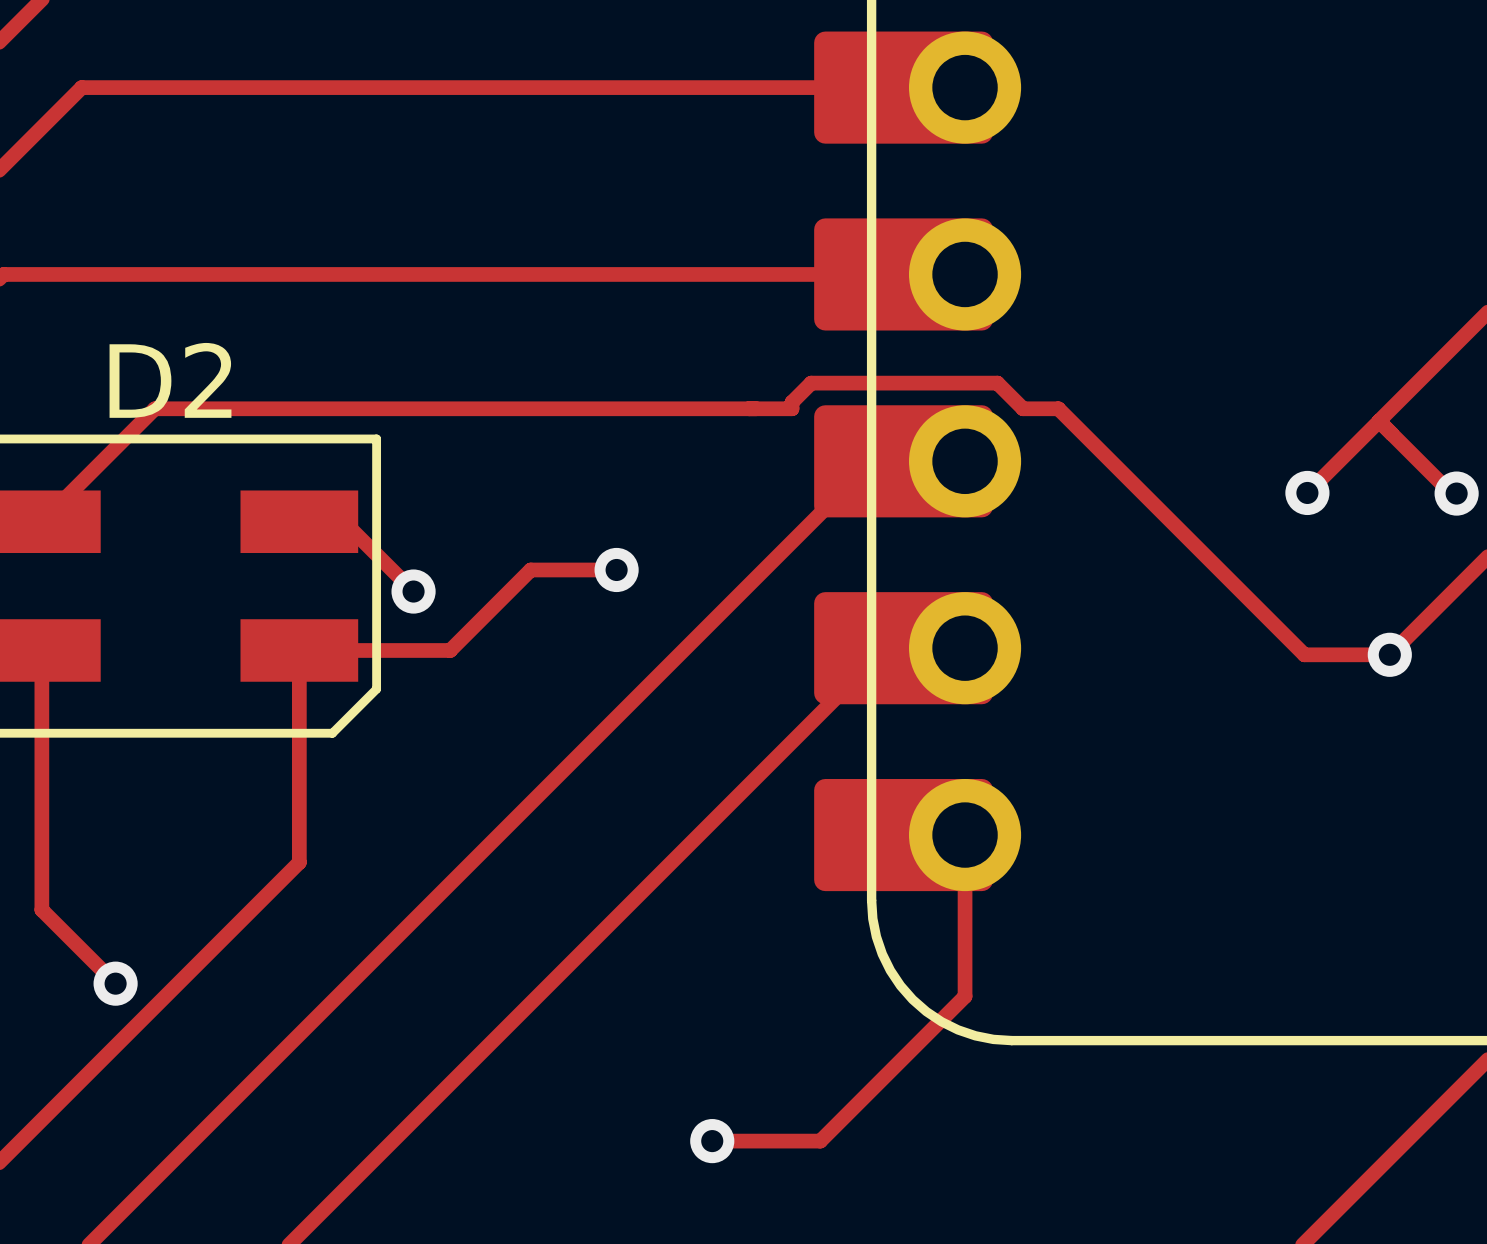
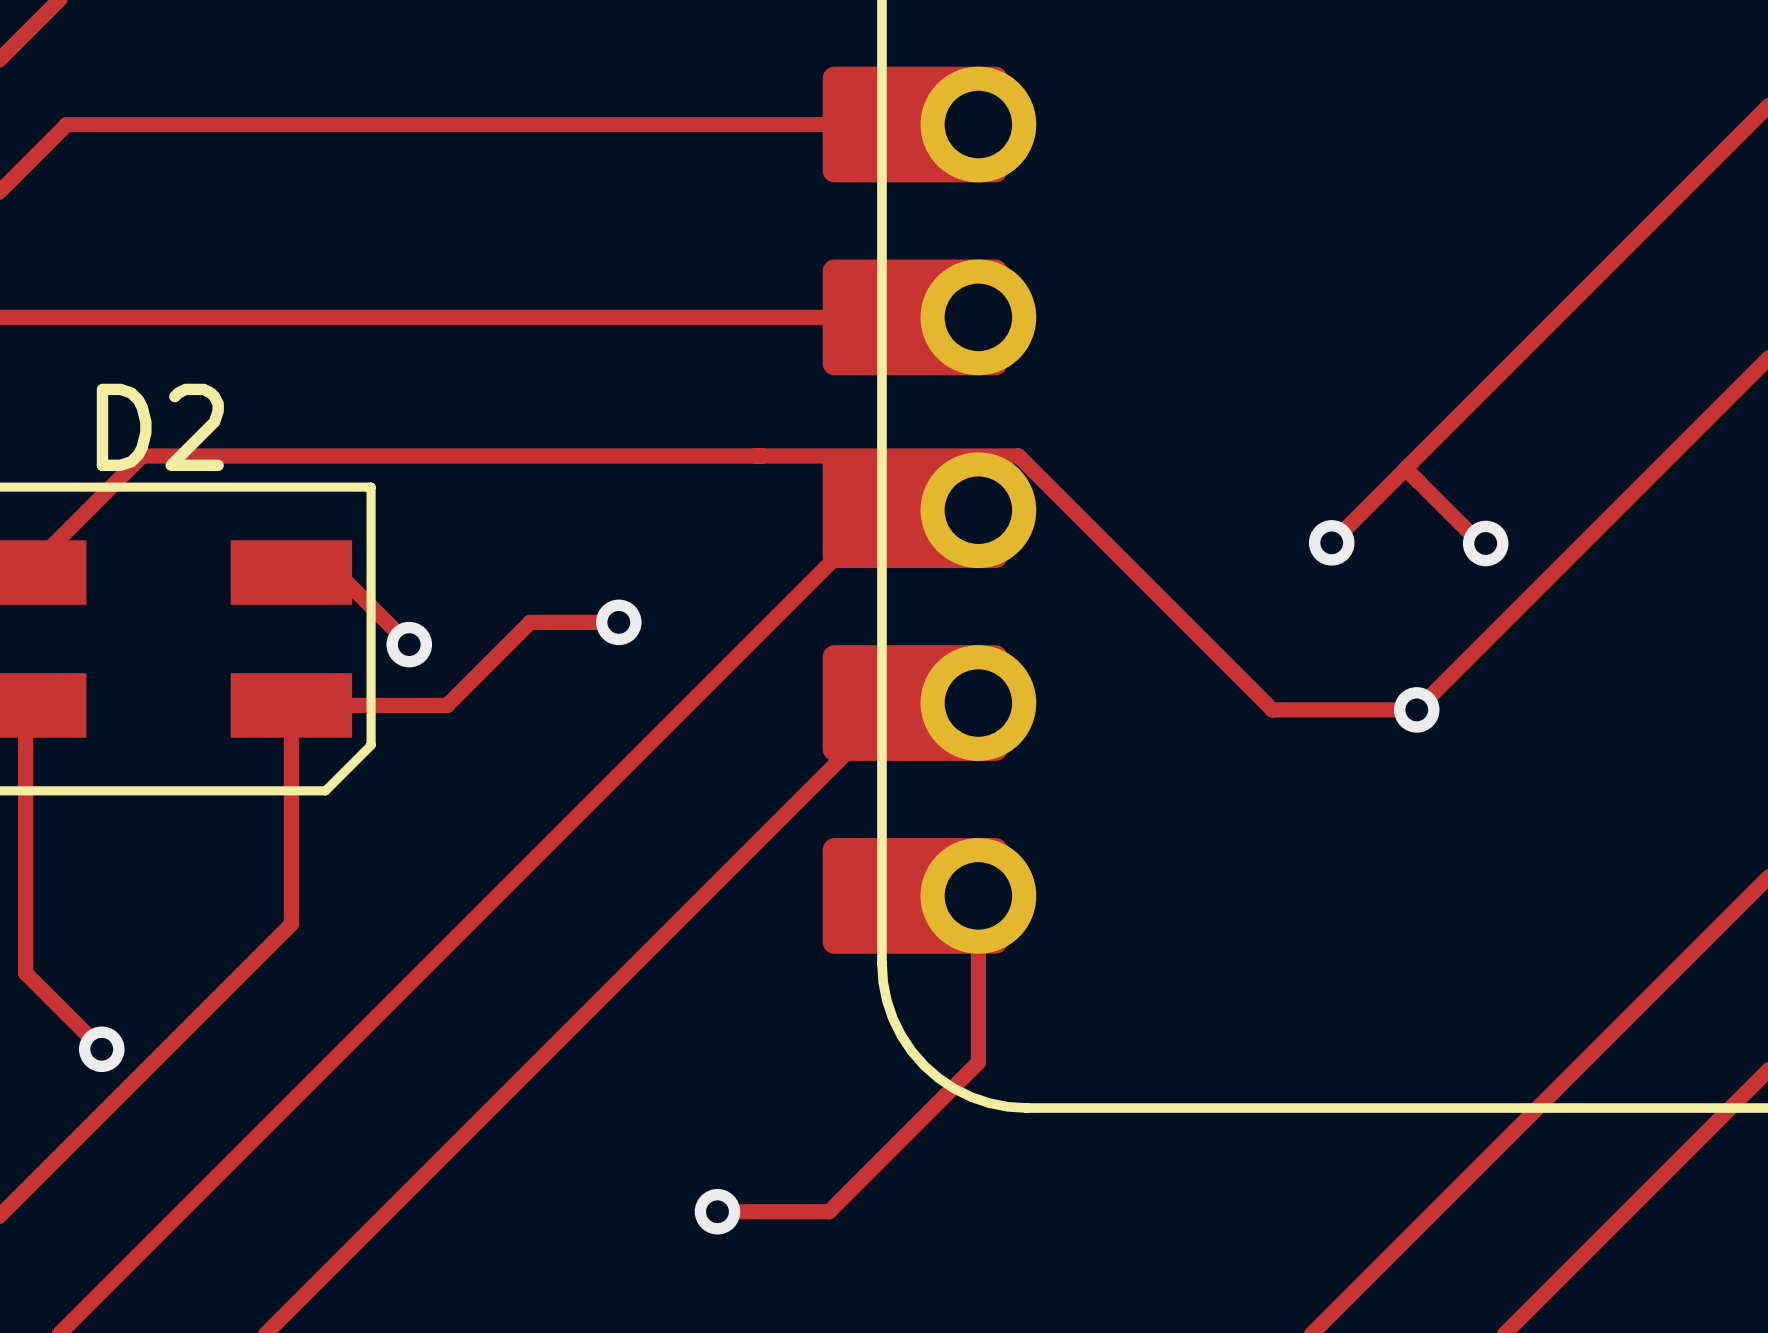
track: (792, 408) (792, 402) (811, 383) (997, 383) (1023, 408) (1058, 408) (1304, 654) -> (799, 455) (1018, 455) (1272, 709) (1328, 709)

